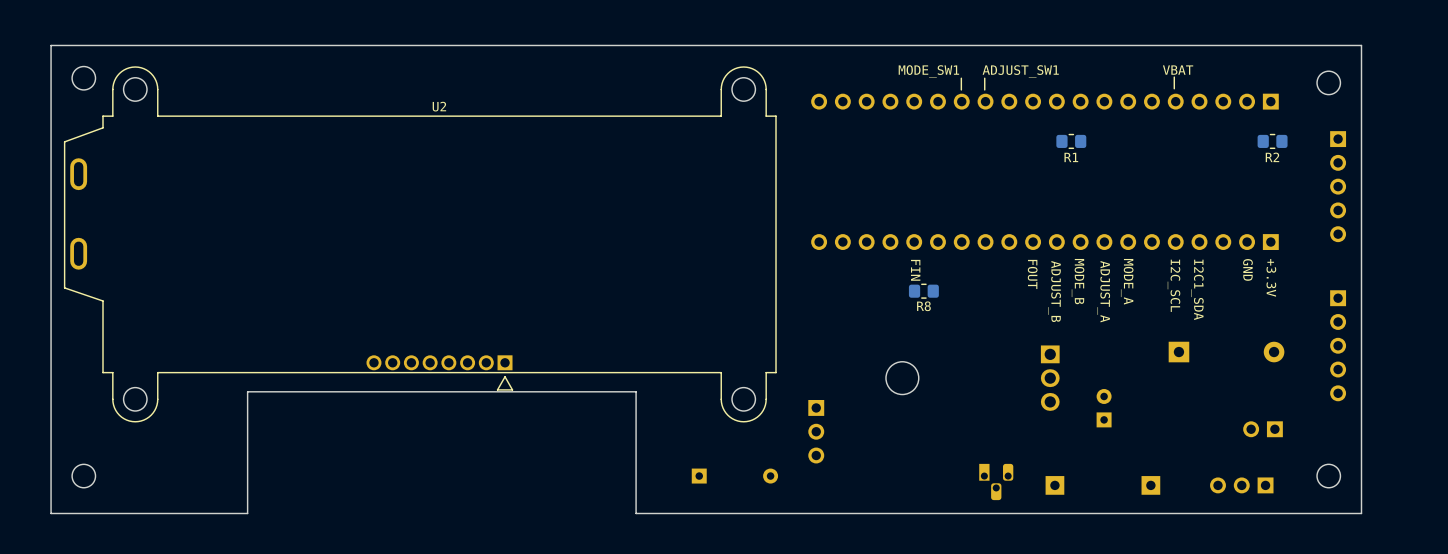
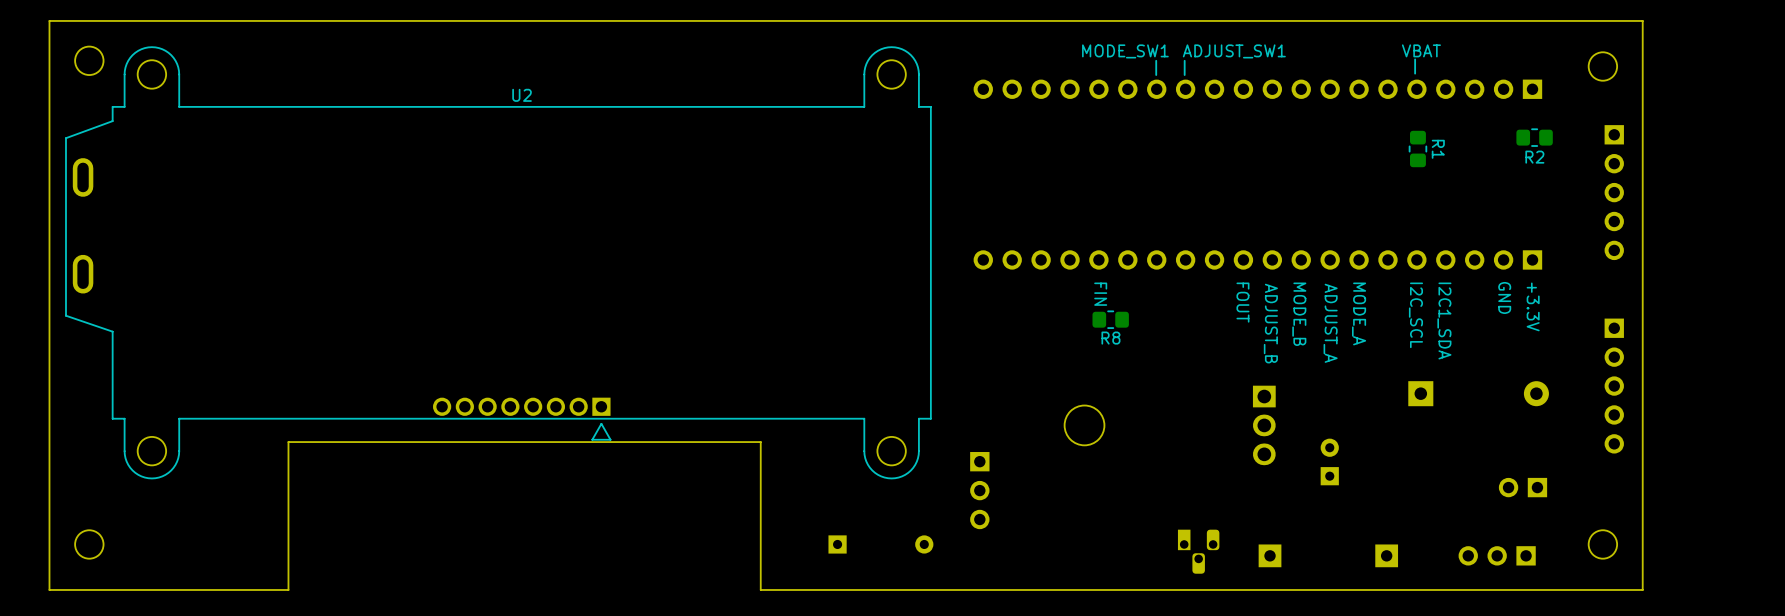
R1 rotation: 0° (1071, 141) -> 90° clockwise (1417, 149)
R1 position: (1071, 141) -> (1417, 149)
R1 name position: R1 (1071, 157) -> R1 (1438, 149)

